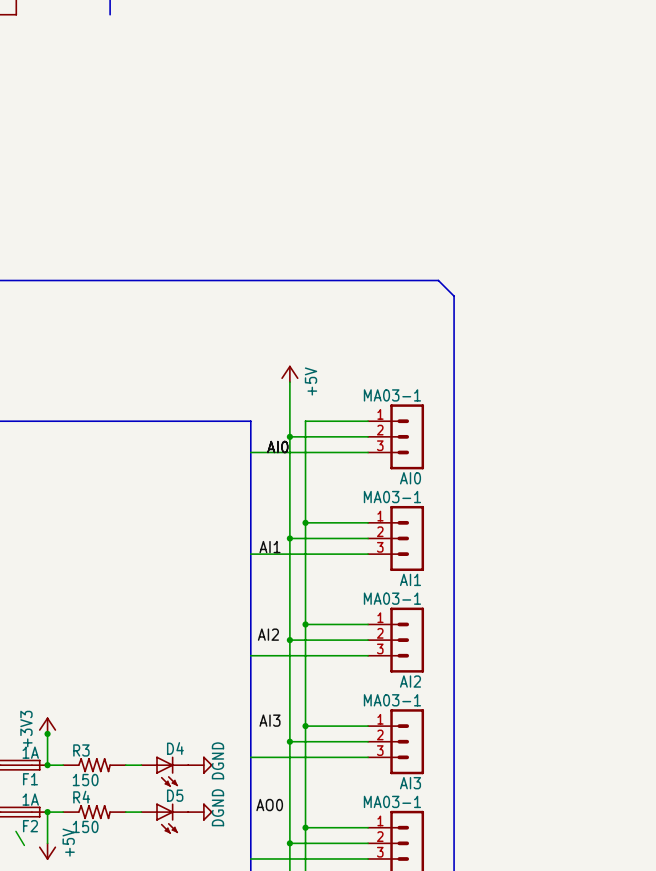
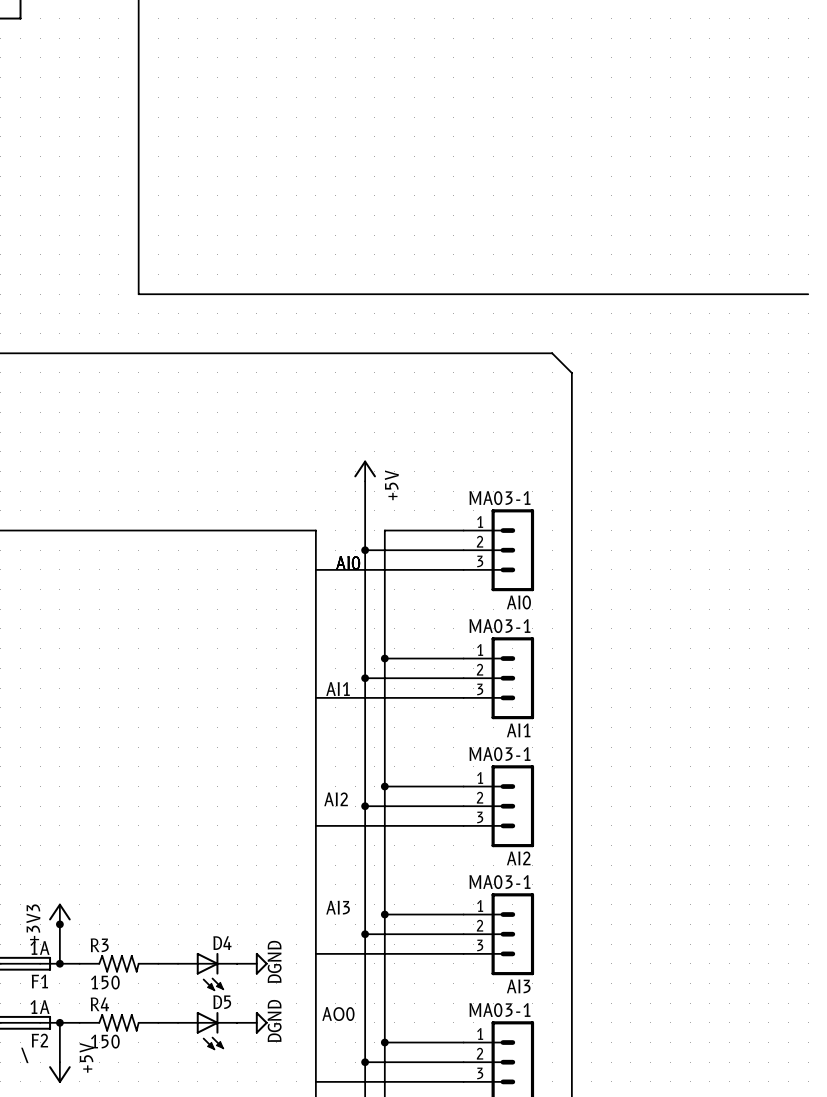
bus: none -> (138, 18) (138, 294) (808, 294)

